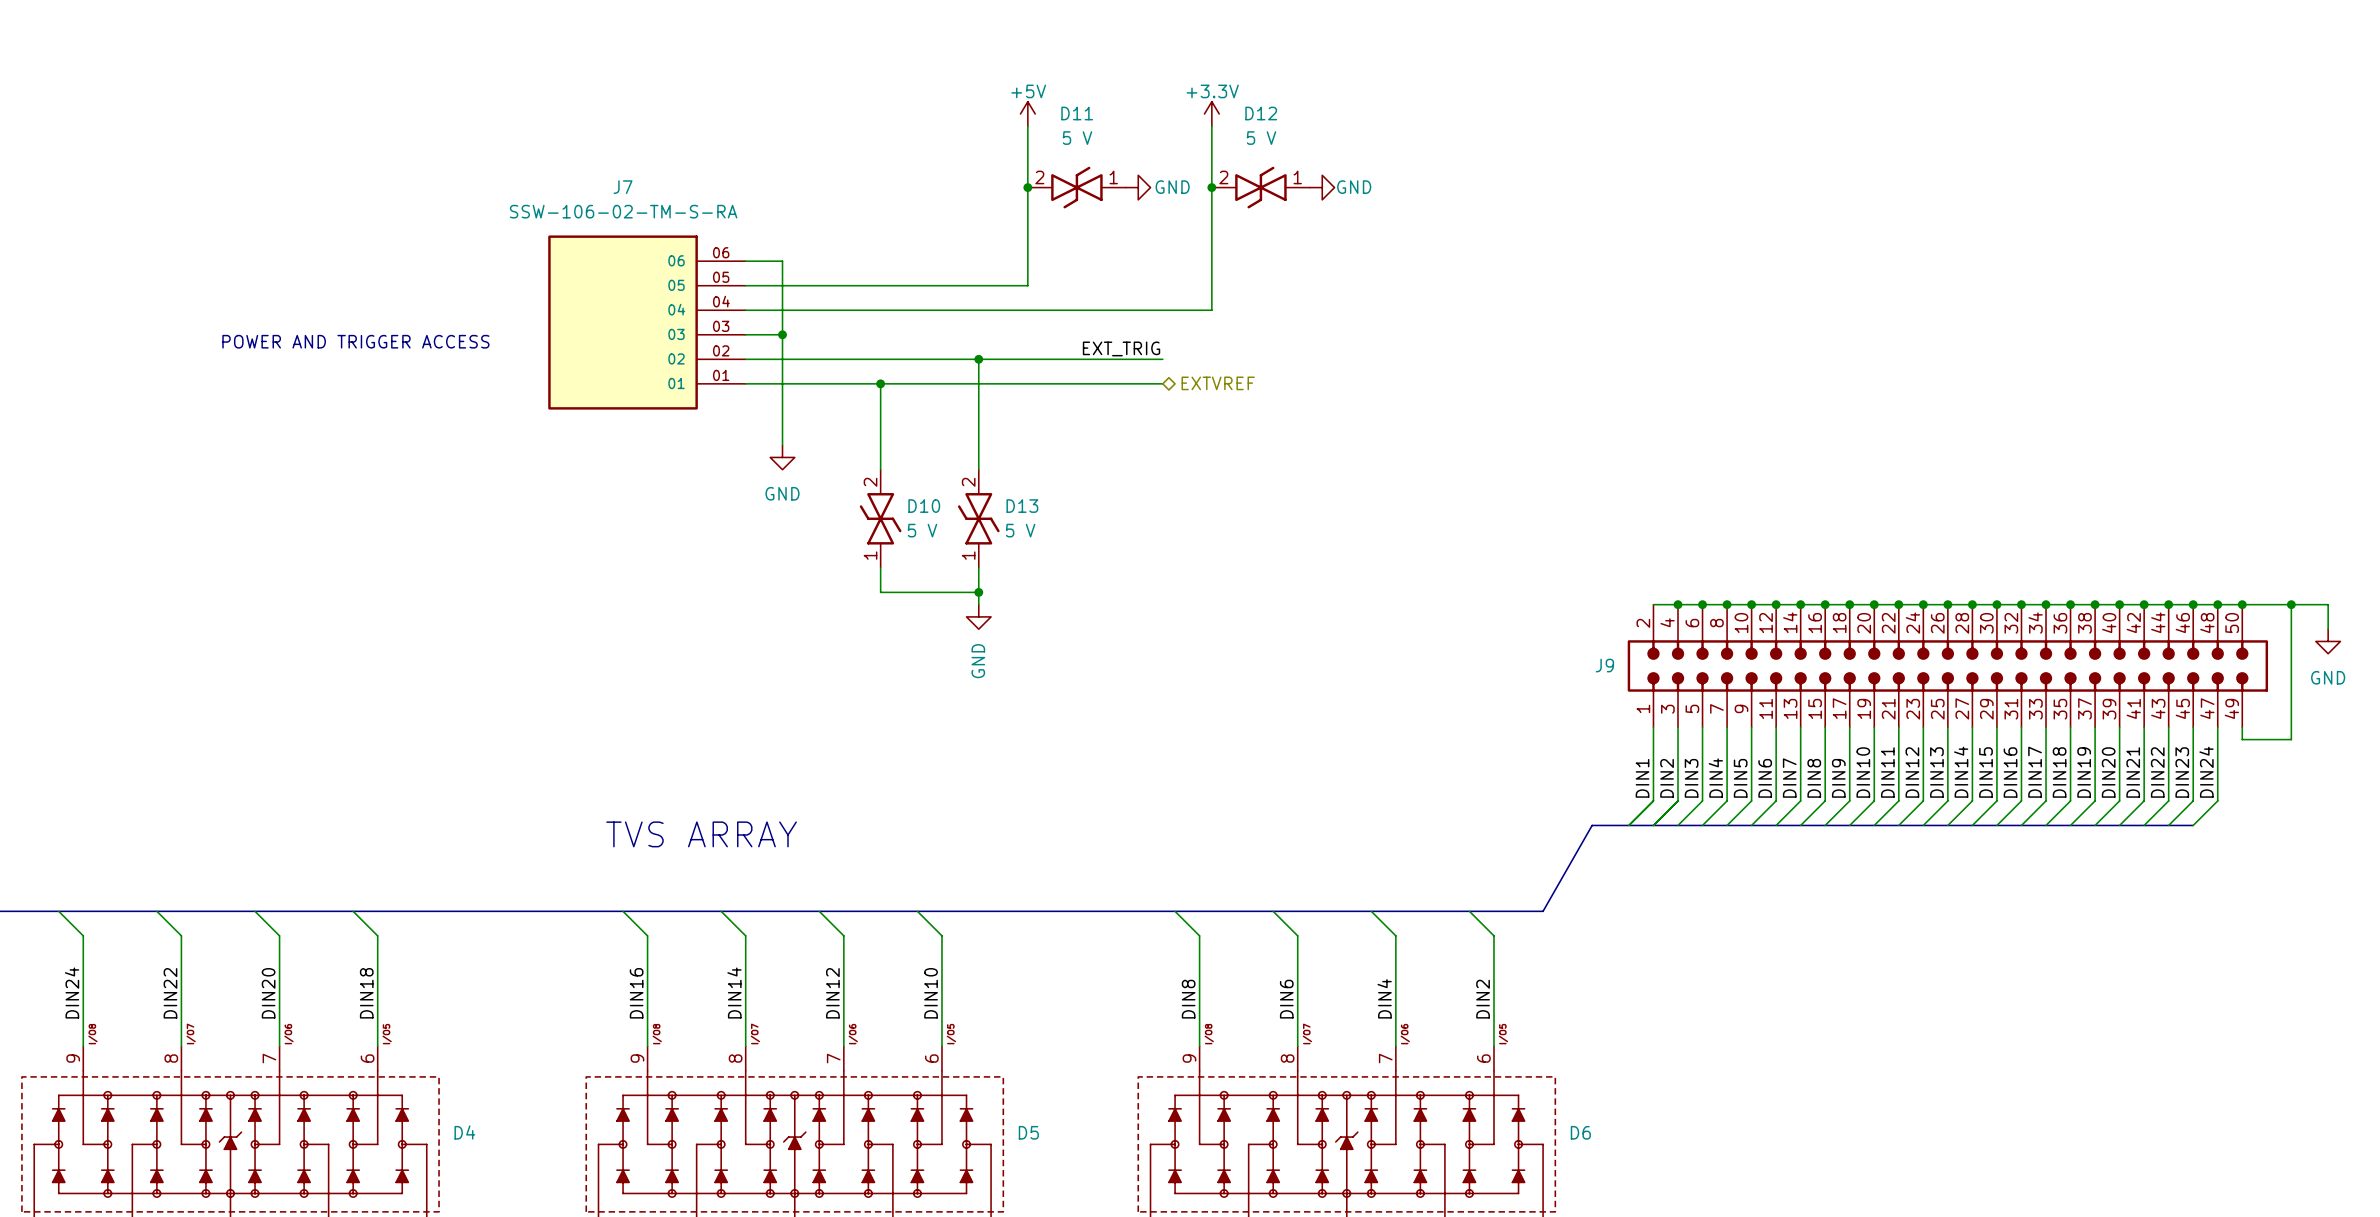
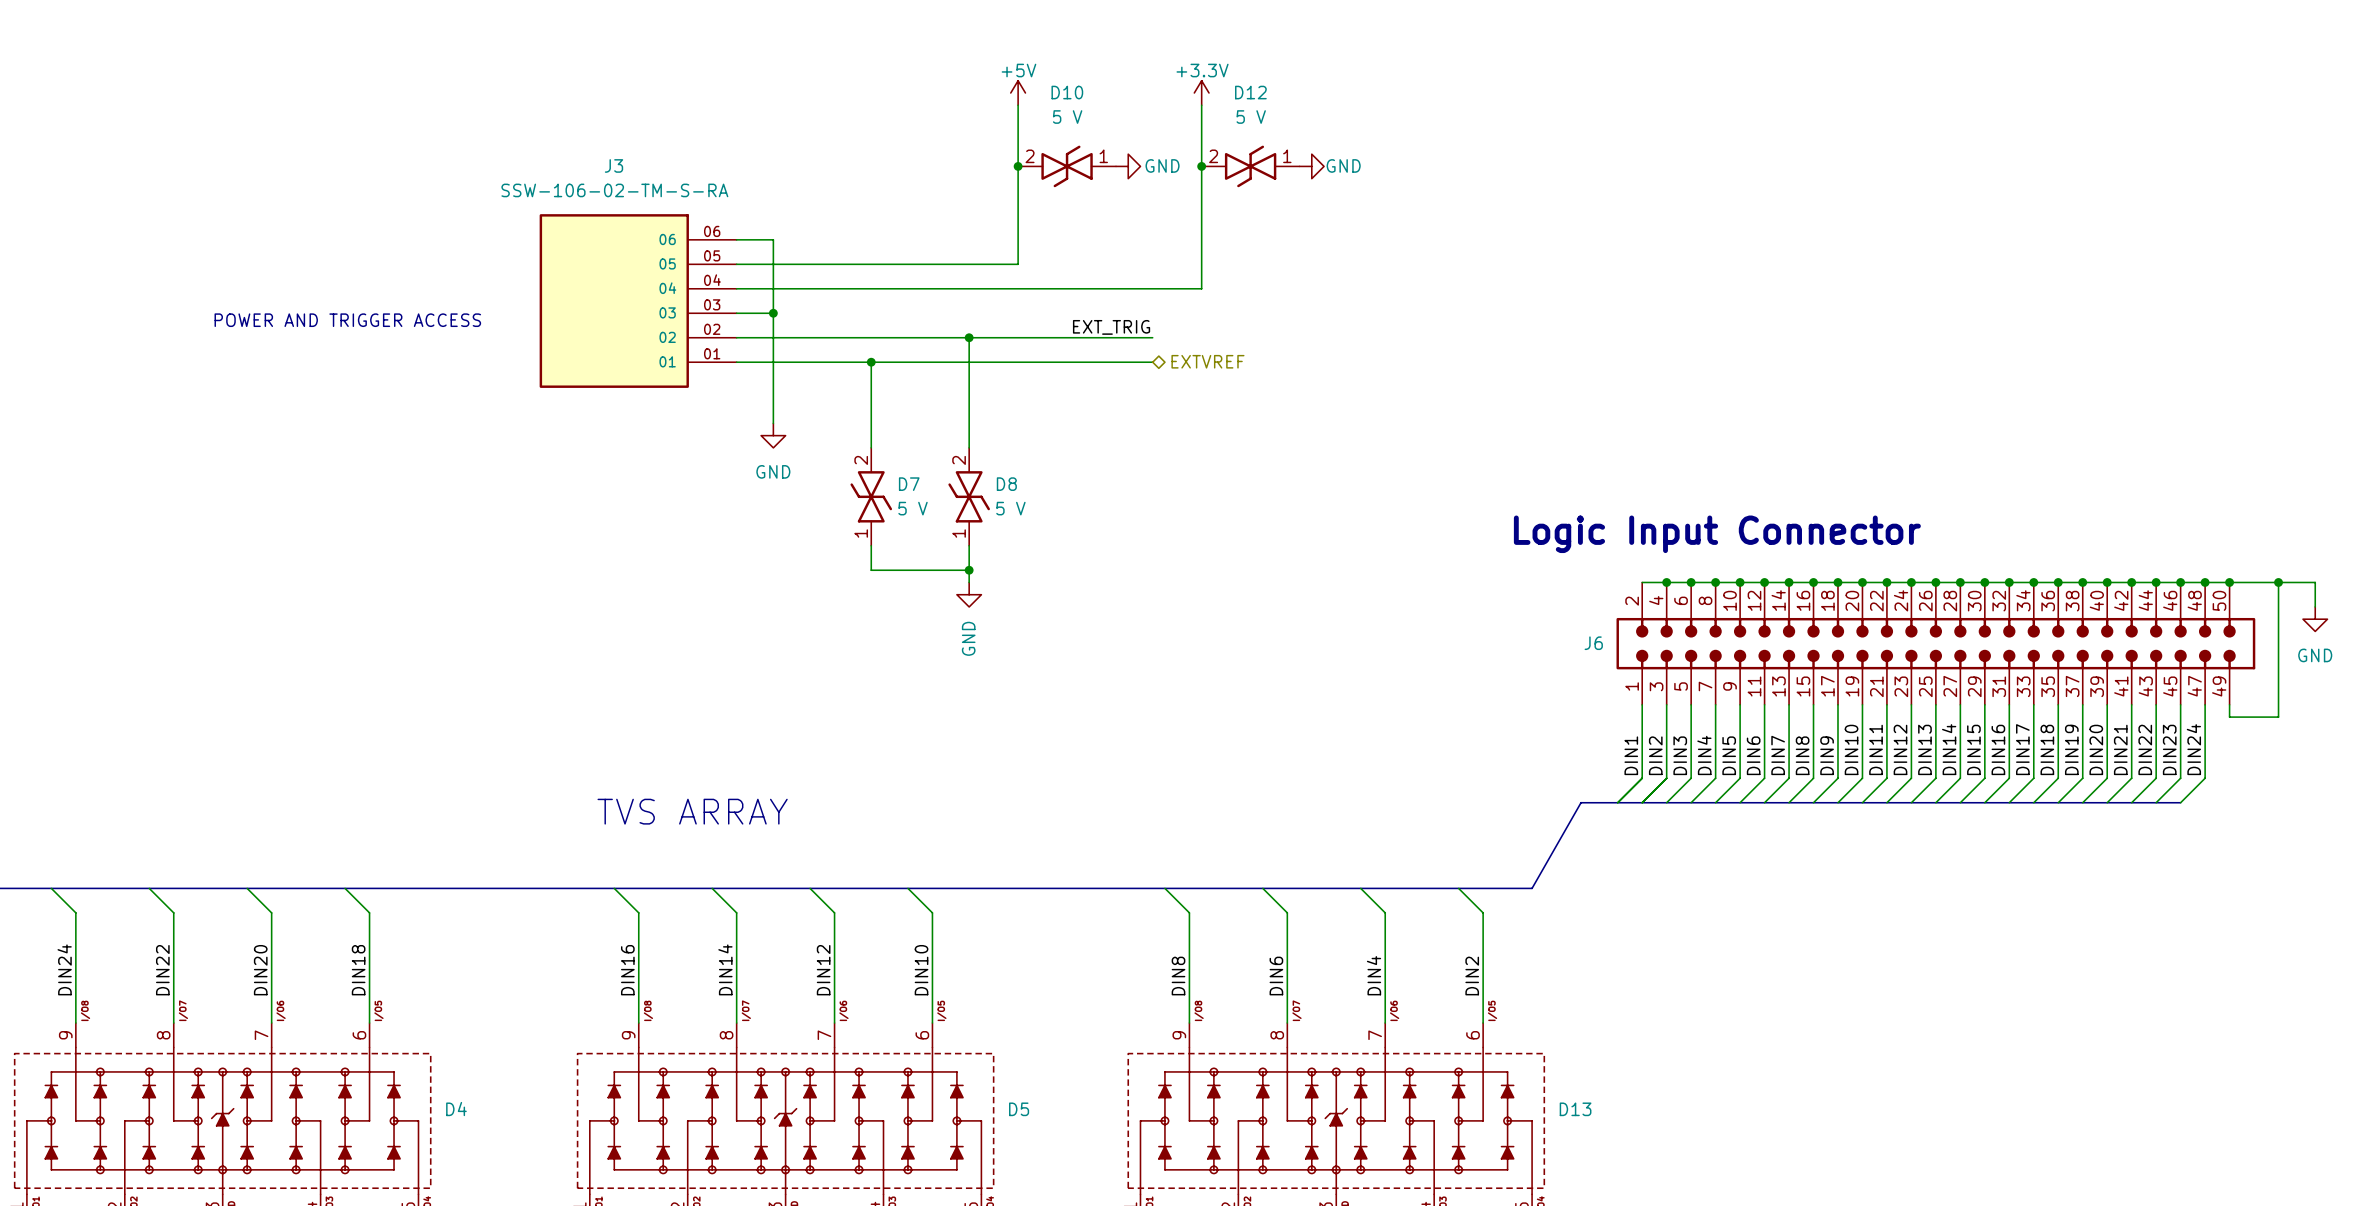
D11 name: D11 (1077, 113) -> D10 (1067, 92)
J7 name: J7 (623, 187) -> J3 (613, 165)
D10 name: D10 (924, 506) -> D7 (909, 484)
D13 name: D13 (1022, 506) -> D8 (1006, 484)
text: none -> Logic Input Connector (1717, 534)
J9 name: J9 (1604, 665) -> J6 (1593, 643)
D6 name: D6 (1580, 1132) -> D13 (1575, 1109)

